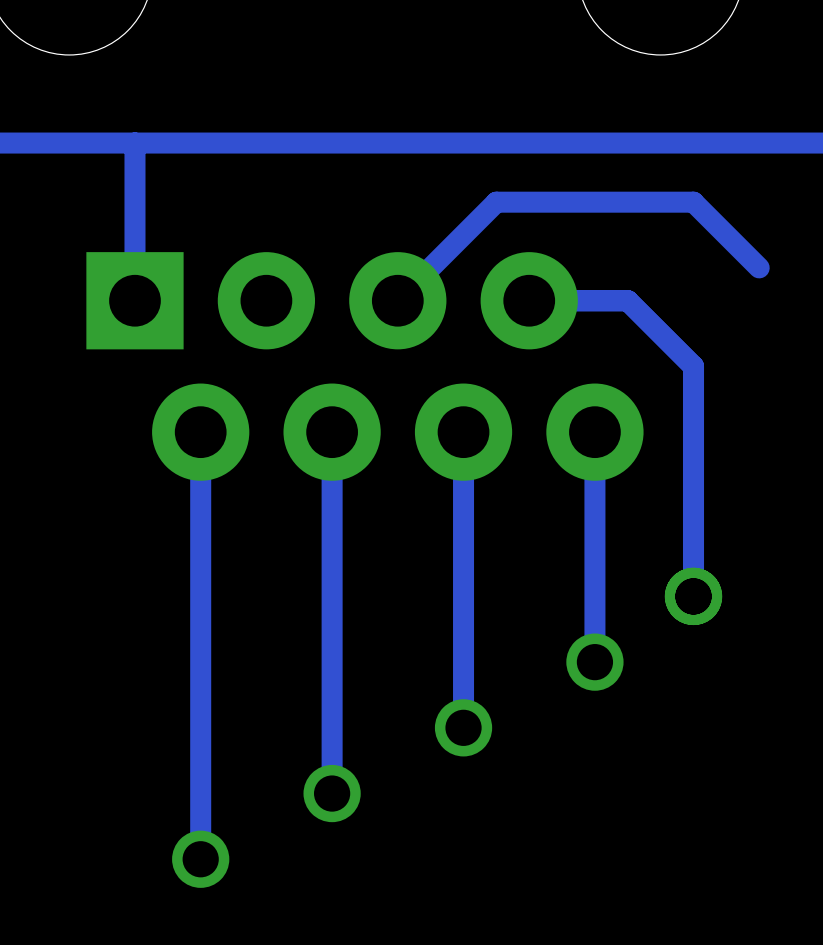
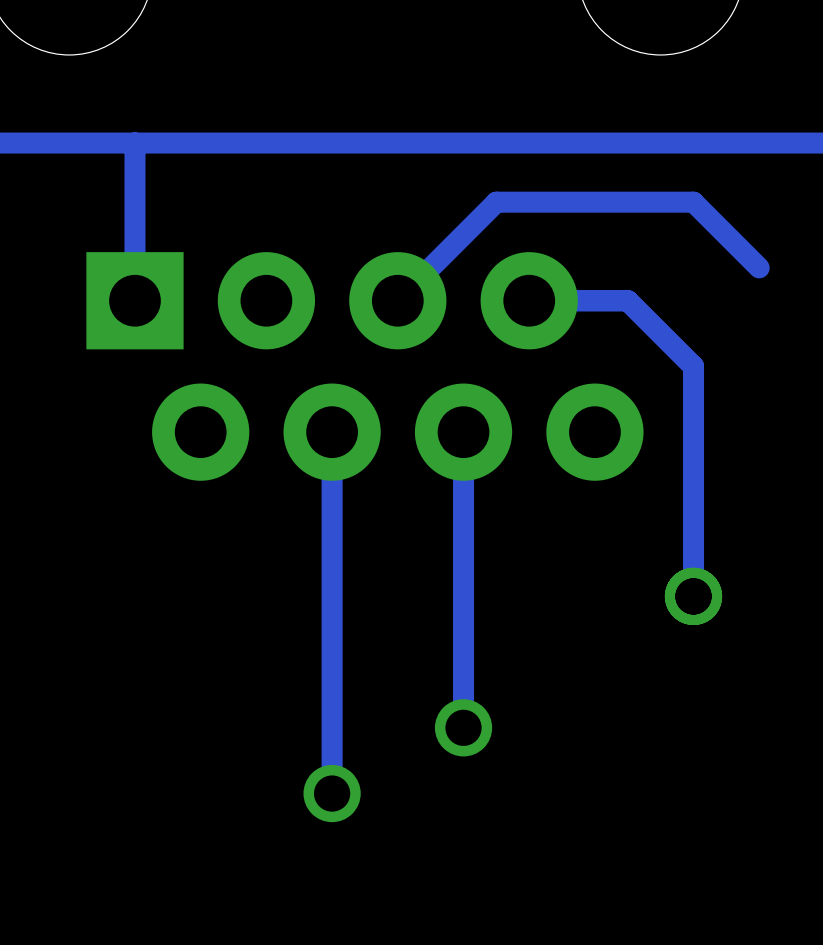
track: (200, 432) (200, 859) -> none
track: (594, 432) (594, 662) -> none
via: (594, 662) -> none
via: (200, 859) -> none

